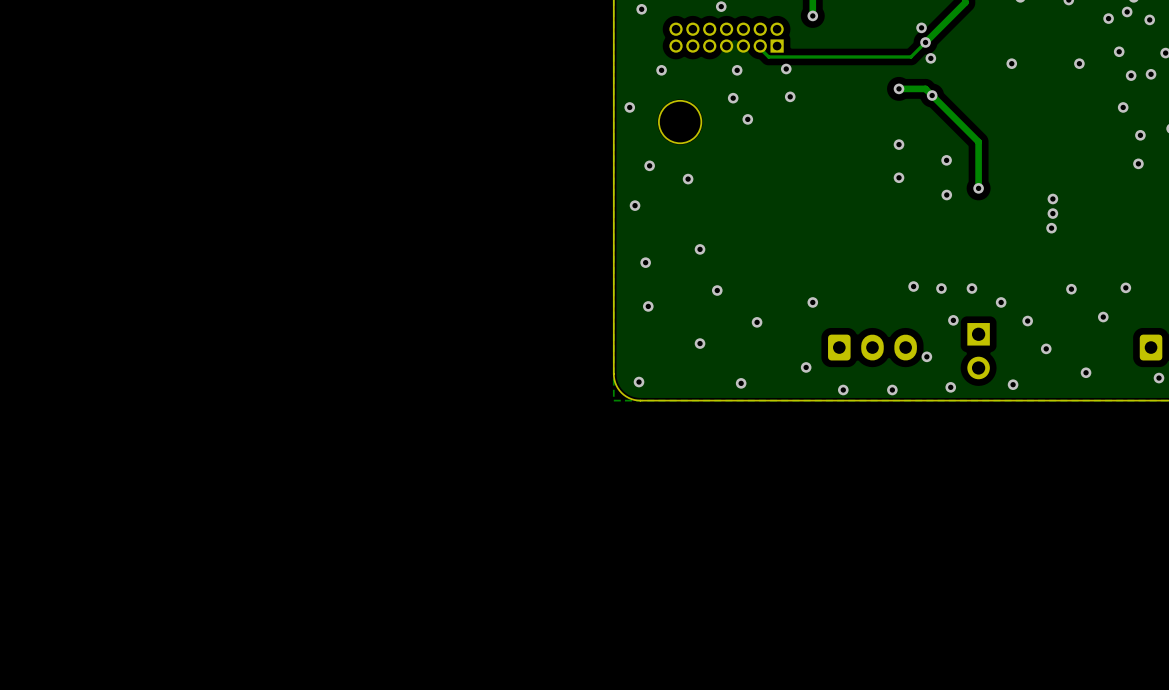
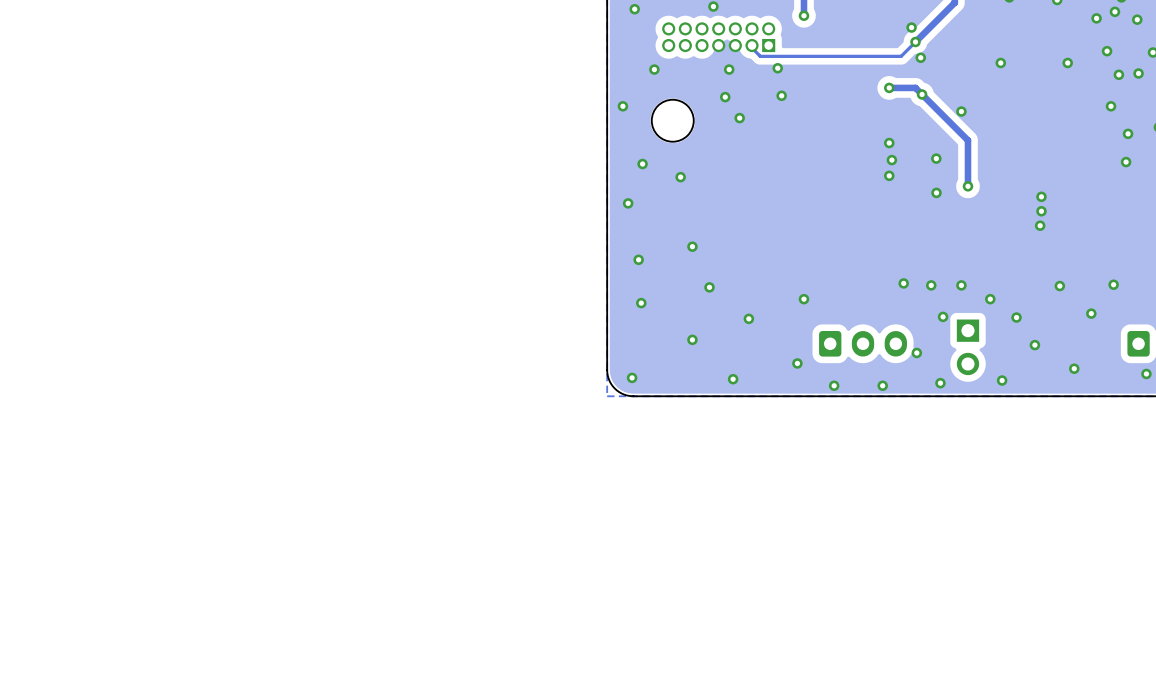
via: none -> (961, 111)
via: none -> (891, 160)

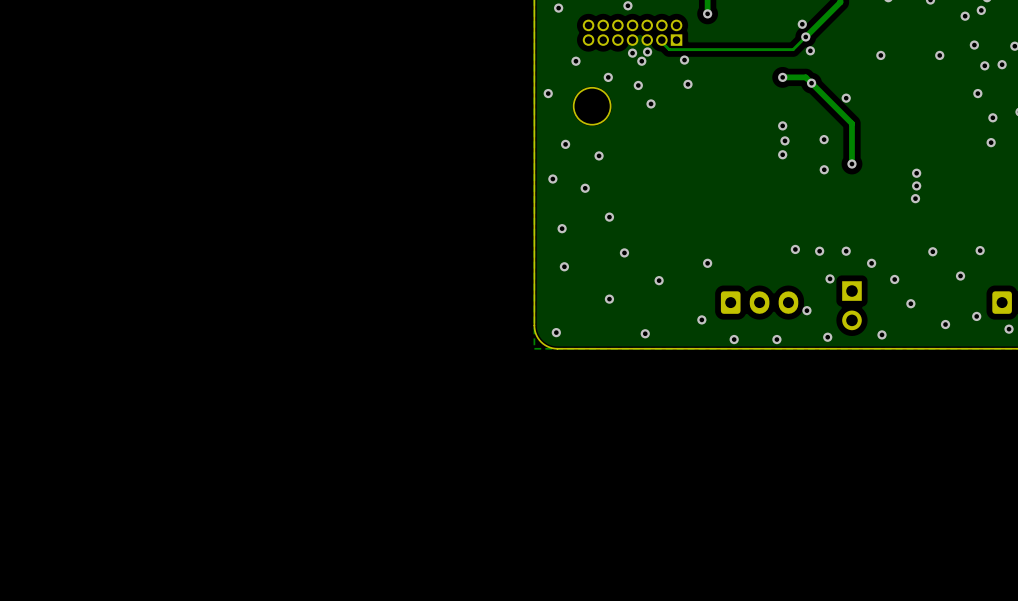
via: (1137, 19) -> none
via: none -> (647, 51)
via: none -> (632, 53)
via: none -> (608, 77)
via: none -> (585, 188)
via: none -> (976, 316)

